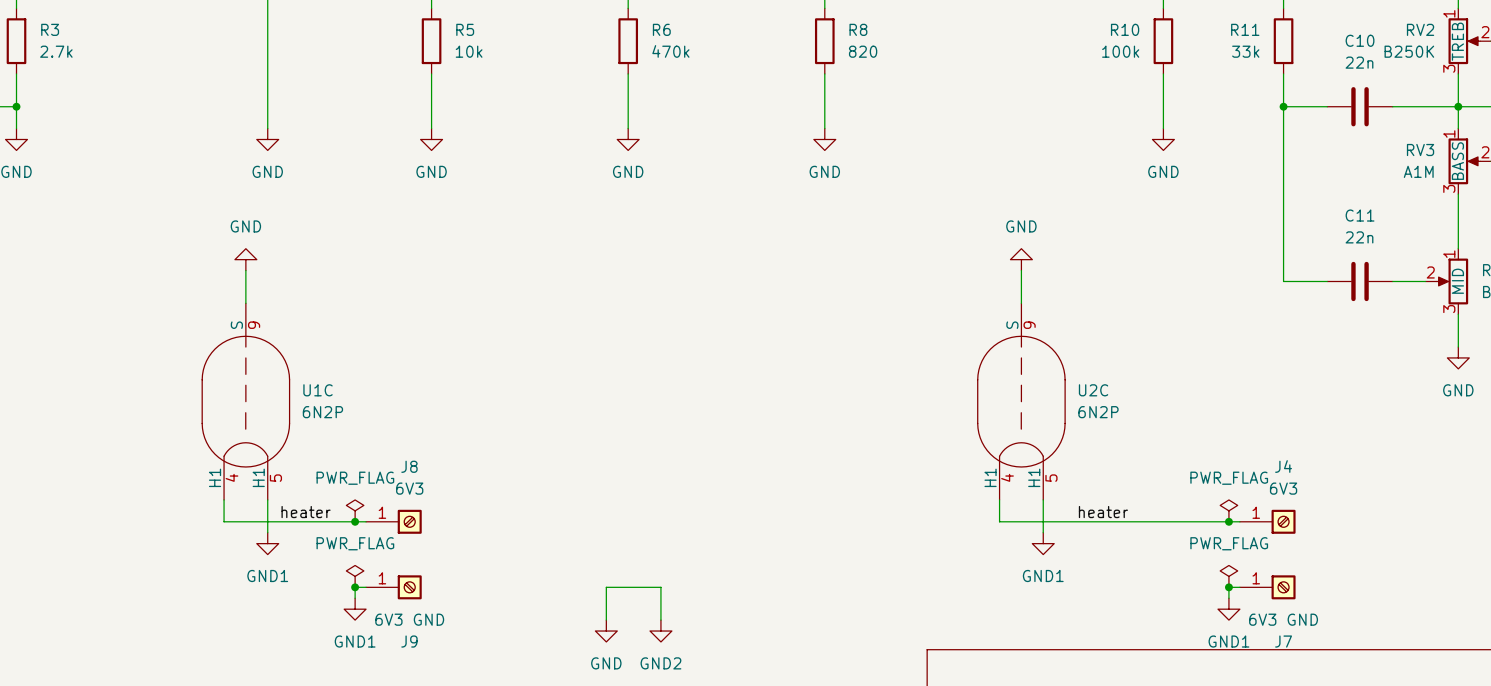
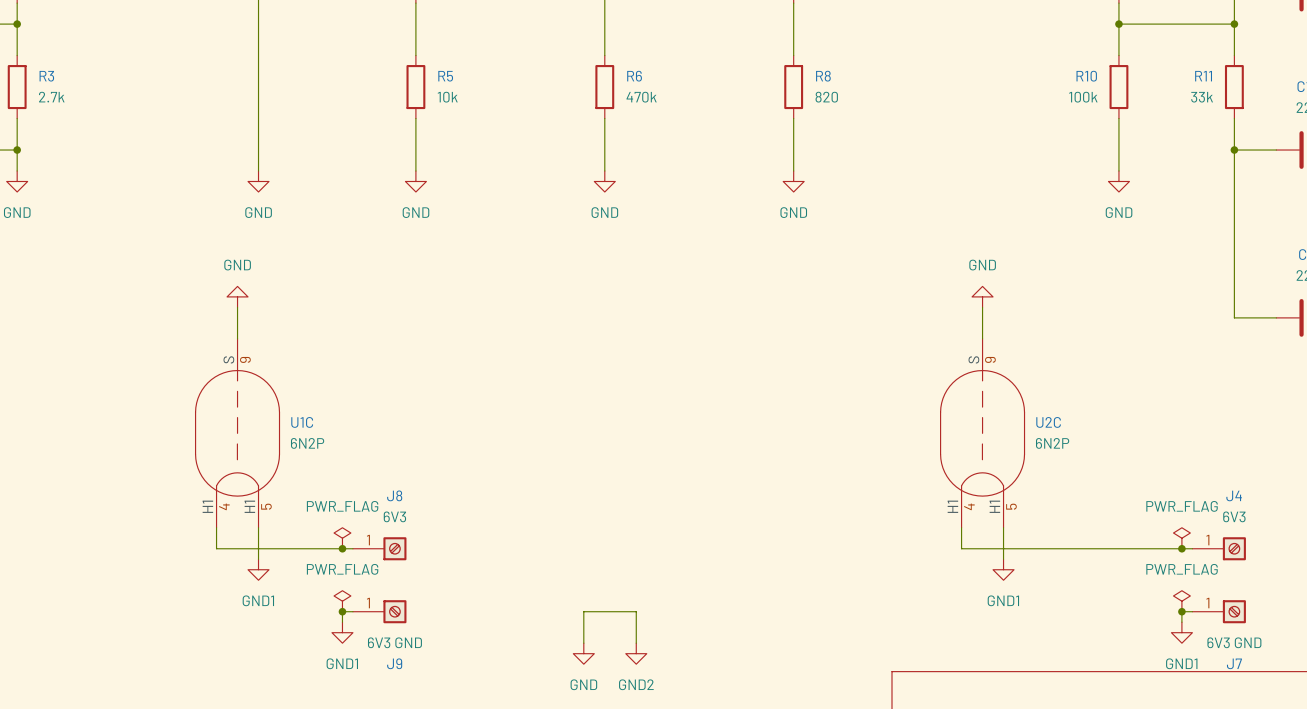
label: heater (306, 512) -> none
label: heater (1103, 512) -> none

